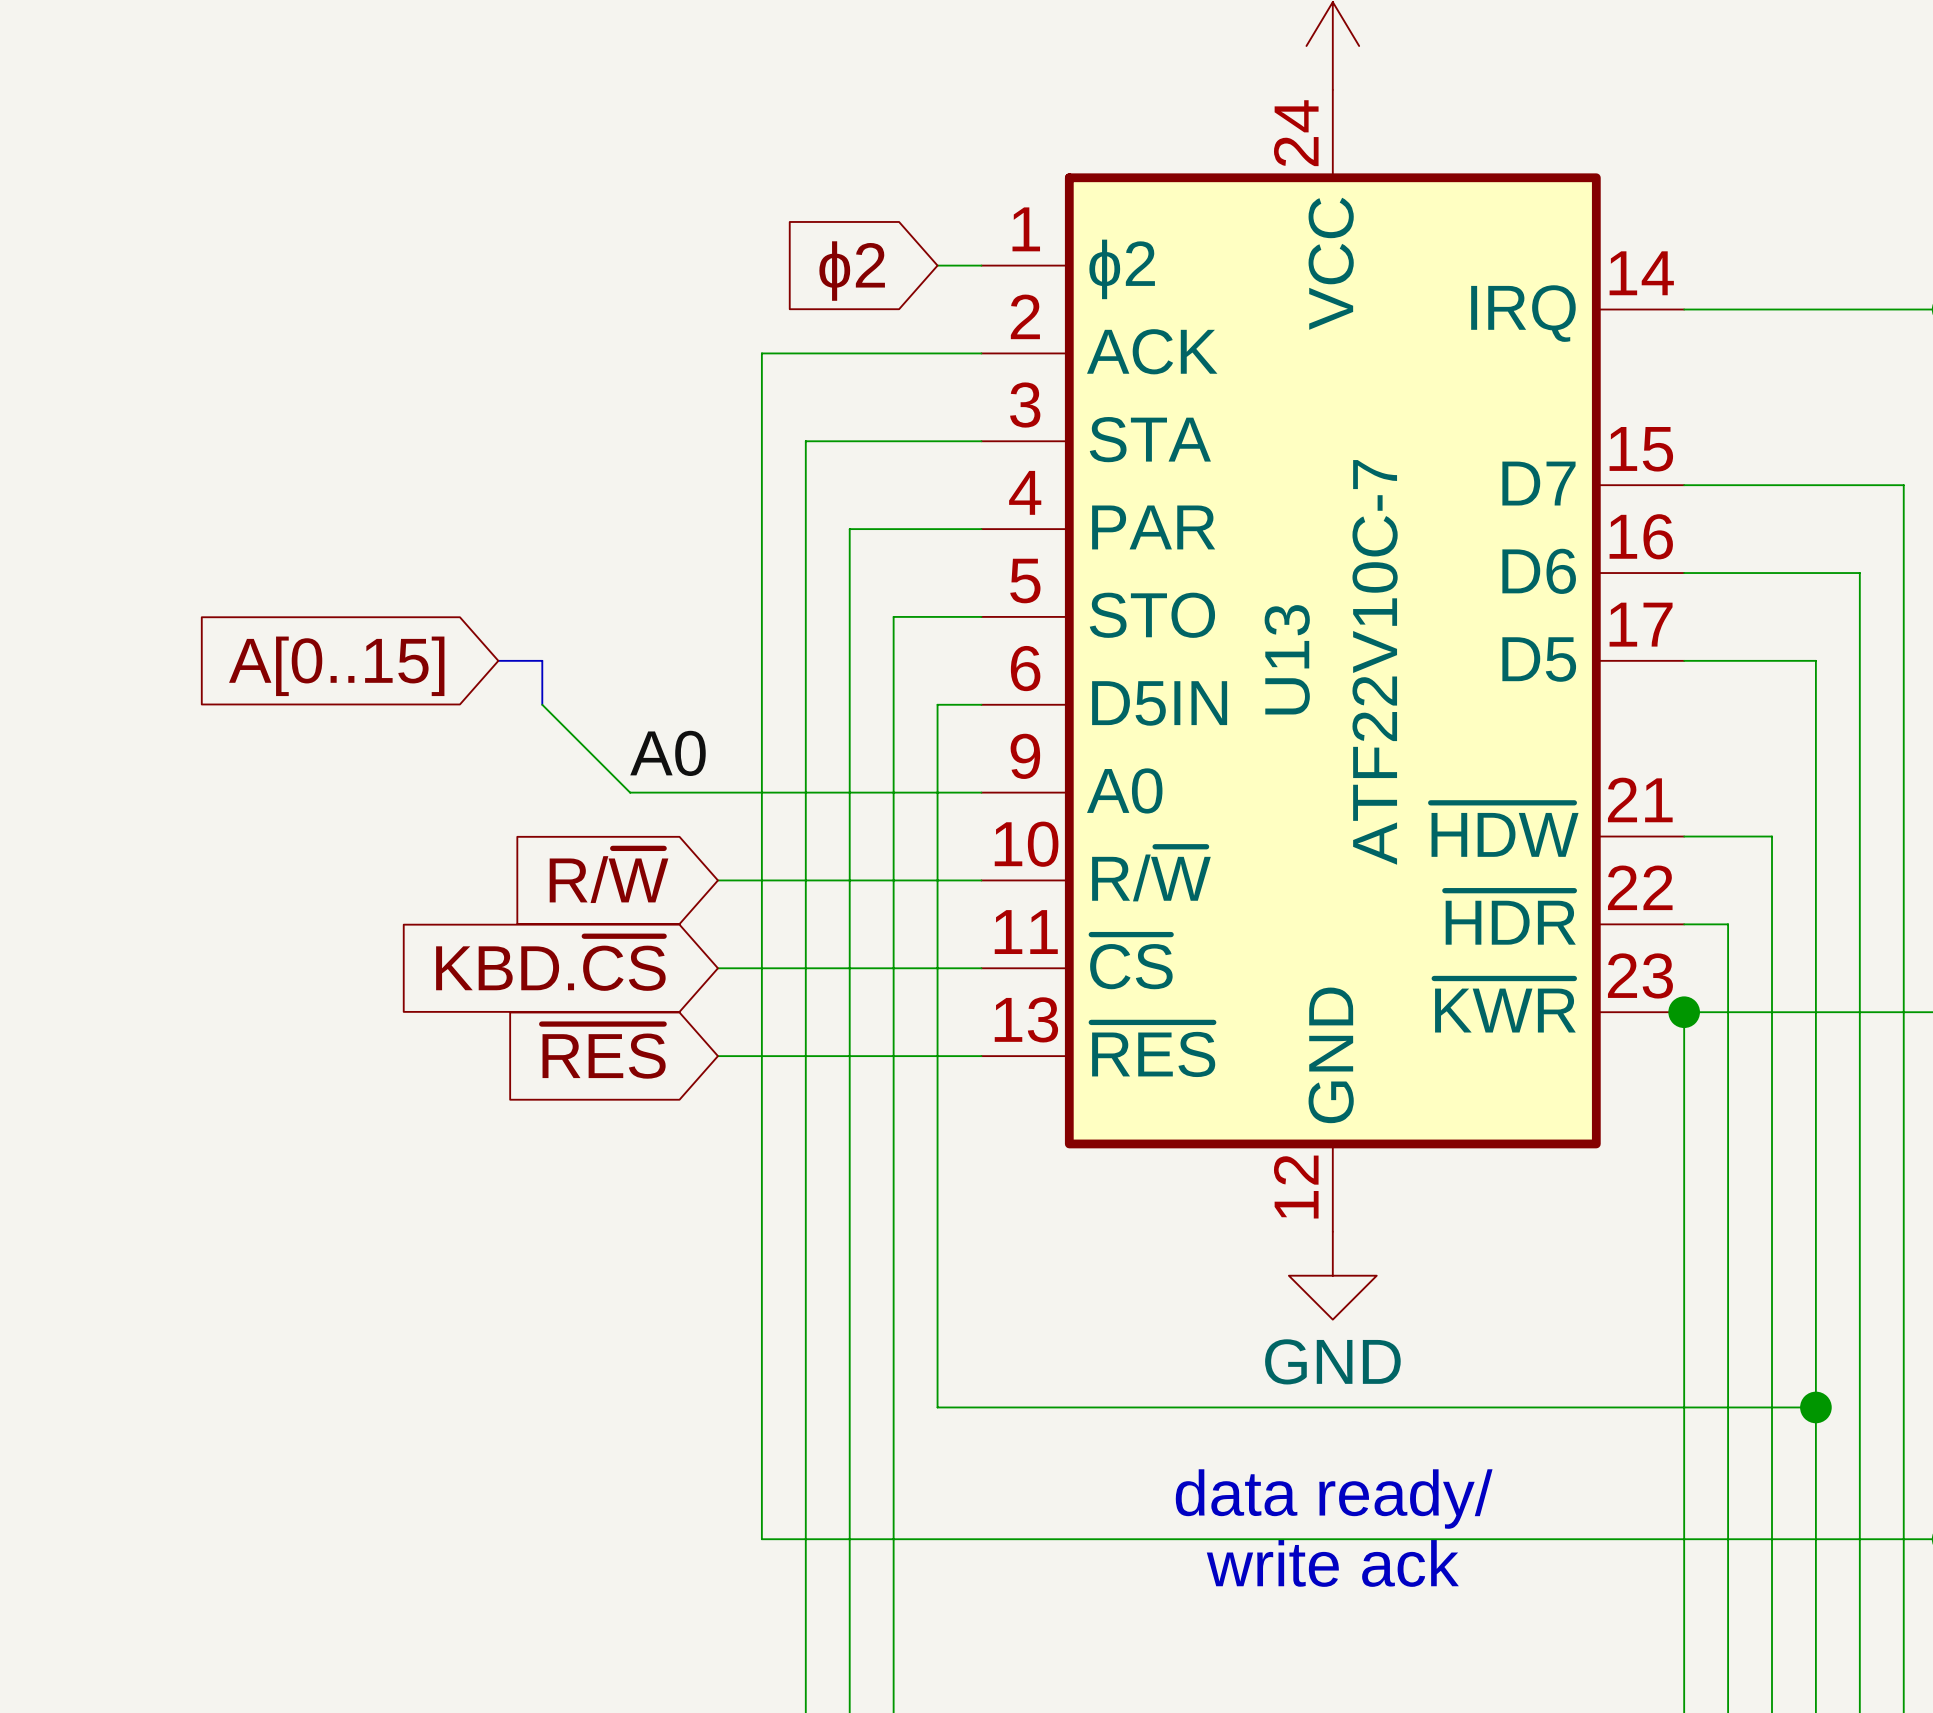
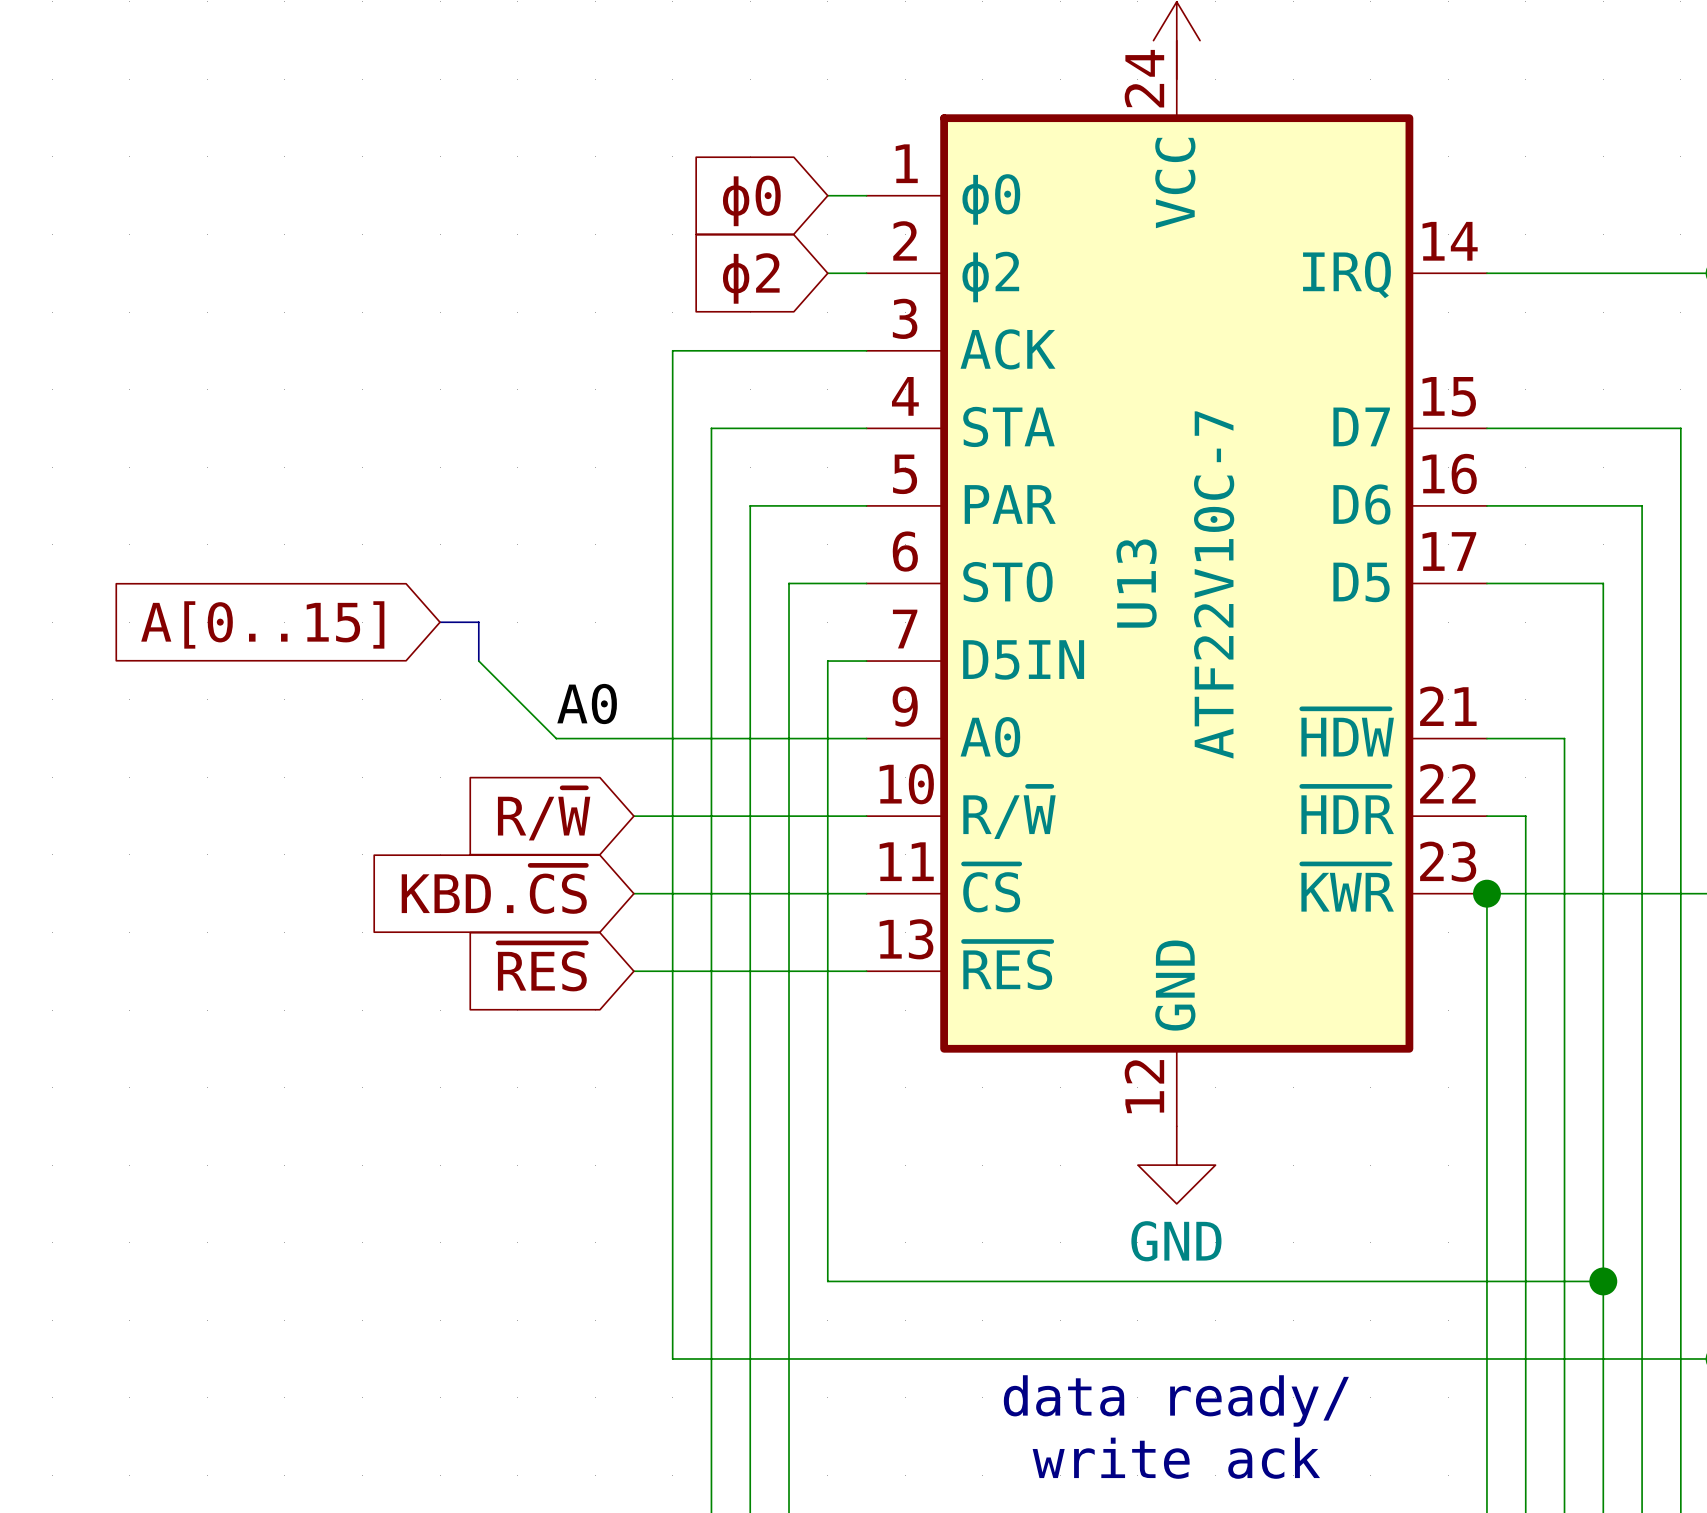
U13 symbol: [981, 89, 1685, 1232] -> [866, 40, 1487, 1127]
wire: none -> (827, 195) (866, 195)
global label: none -> ϕ0 (751, 200)
wire: (937, 265) (981, 265) -> (827, 273) (866, 273)
global label position: ϕ2 (852, 271) -> ϕ2 (751, 278)
wire: (981, 353) (761, 353) (761, 397) -> (866, 350) (672, 350)
wire: (981, 441) (805, 441) (805, 485) -> (866, 428) (711, 428)
wire: (981, 529) (849, 529) (849, 573) -> (866, 505) (750, 505)
wire: (981, 616) (893, 616) (893, 660) -> (866, 583) (789, 583)
bus: (498, 660) (542, 660) (542, 704) -> (440, 622) (478, 622) (478, 661)
global label position: A[0..15] (336, 666) -> A[0..15] (262, 624)
wire: (542, 704) (630, 792) (981, 792) -> (478, 661) (556, 738) (866, 738)
wire: (981, 704) (937, 704) (937, 748) -> (866, 661) (827, 661)
label position: A0 (667, 753) -> A0 (587, 704)
global label position: R/~{W} (609, 875) -> R/~{W} (544, 814)
wire: (717, 880) (981, 880) -> (633, 816) (866, 816)
global label position: KBD.~{CS} (550, 963) -> KBD.~{CS} (494, 889)
wire: (717, 968) (981, 968) -> (633, 893) (866, 893)
global label position: ~{RES} (603, 1051) -> ~{RES} (542, 967)
wire: (717, 1056) (981, 1056) -> (633, 971) (866, 971)
power symbol position: GND (1332, 1275) -> GND (1176, 1165)
wire: (937, 1407) (1815, 1407) -> (827, 1242) (827, 1281) (1603, 1281)
junction position: (1815, 1407) -> (1603, 1281)
text position: data ready/ (1334, 1499) -> data ready/ (1176, 1400)
text position: write ack (1332, 1563) -> write ack (1176, 1458)

